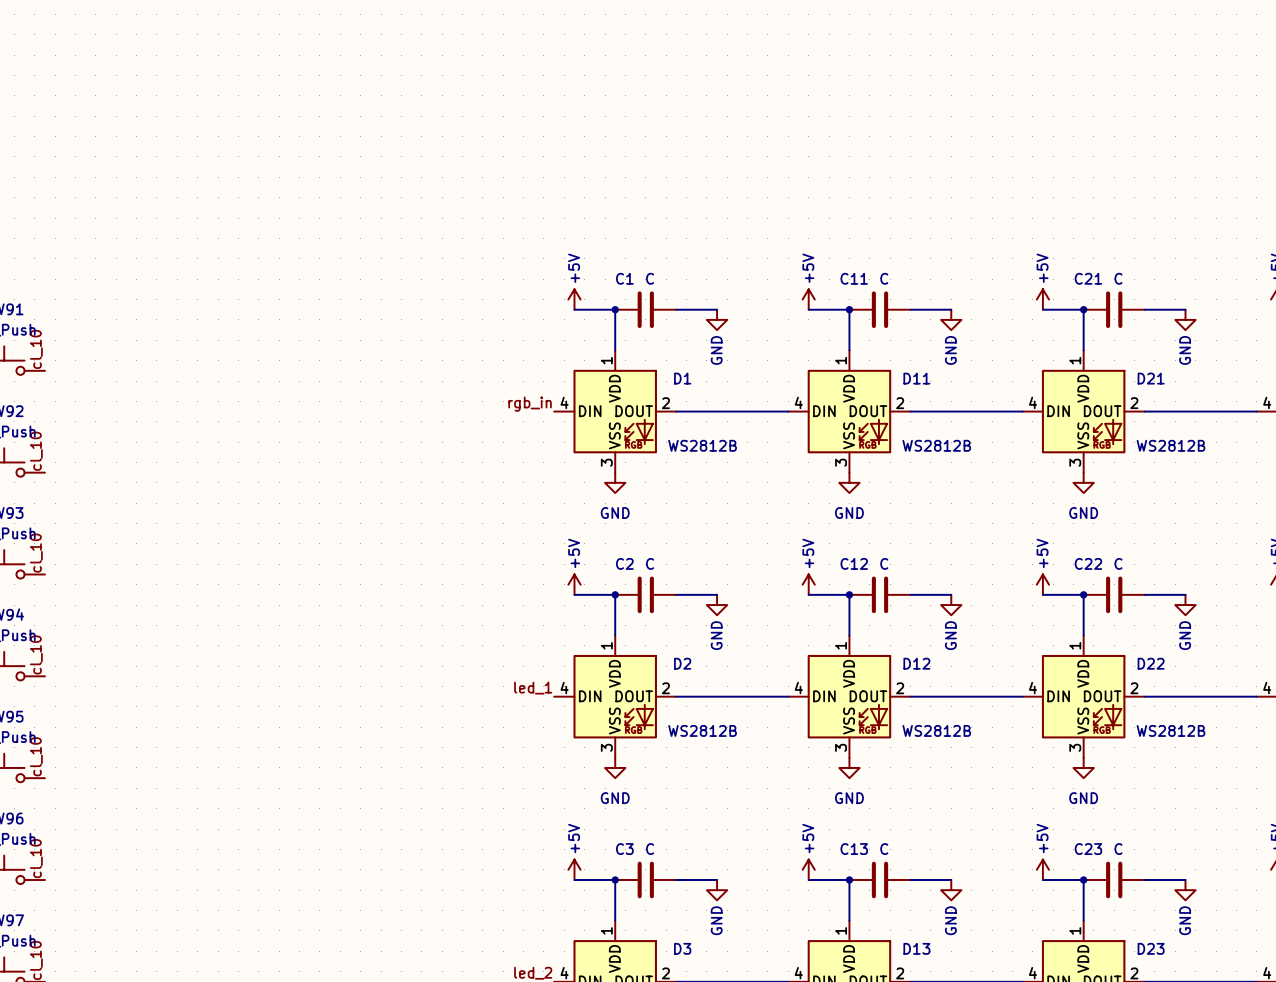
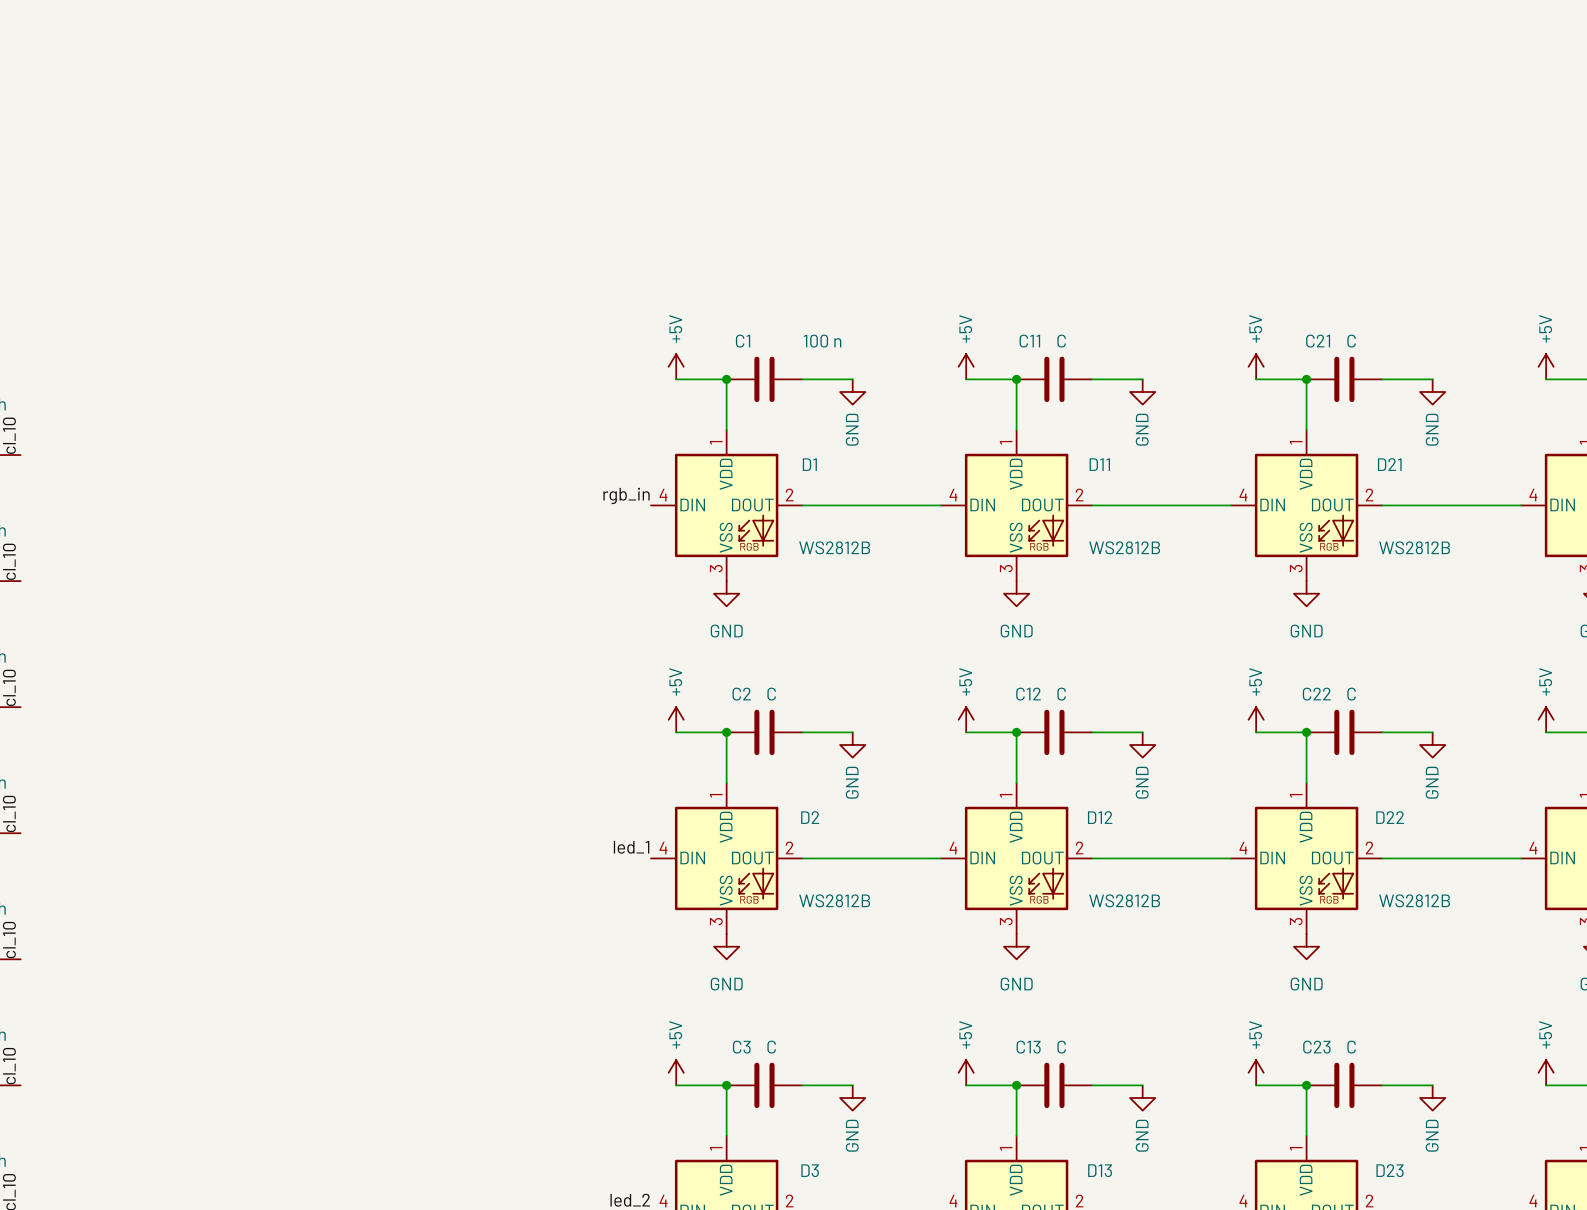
C1 value: C (650, 278) -> 100 n (822, 341)

